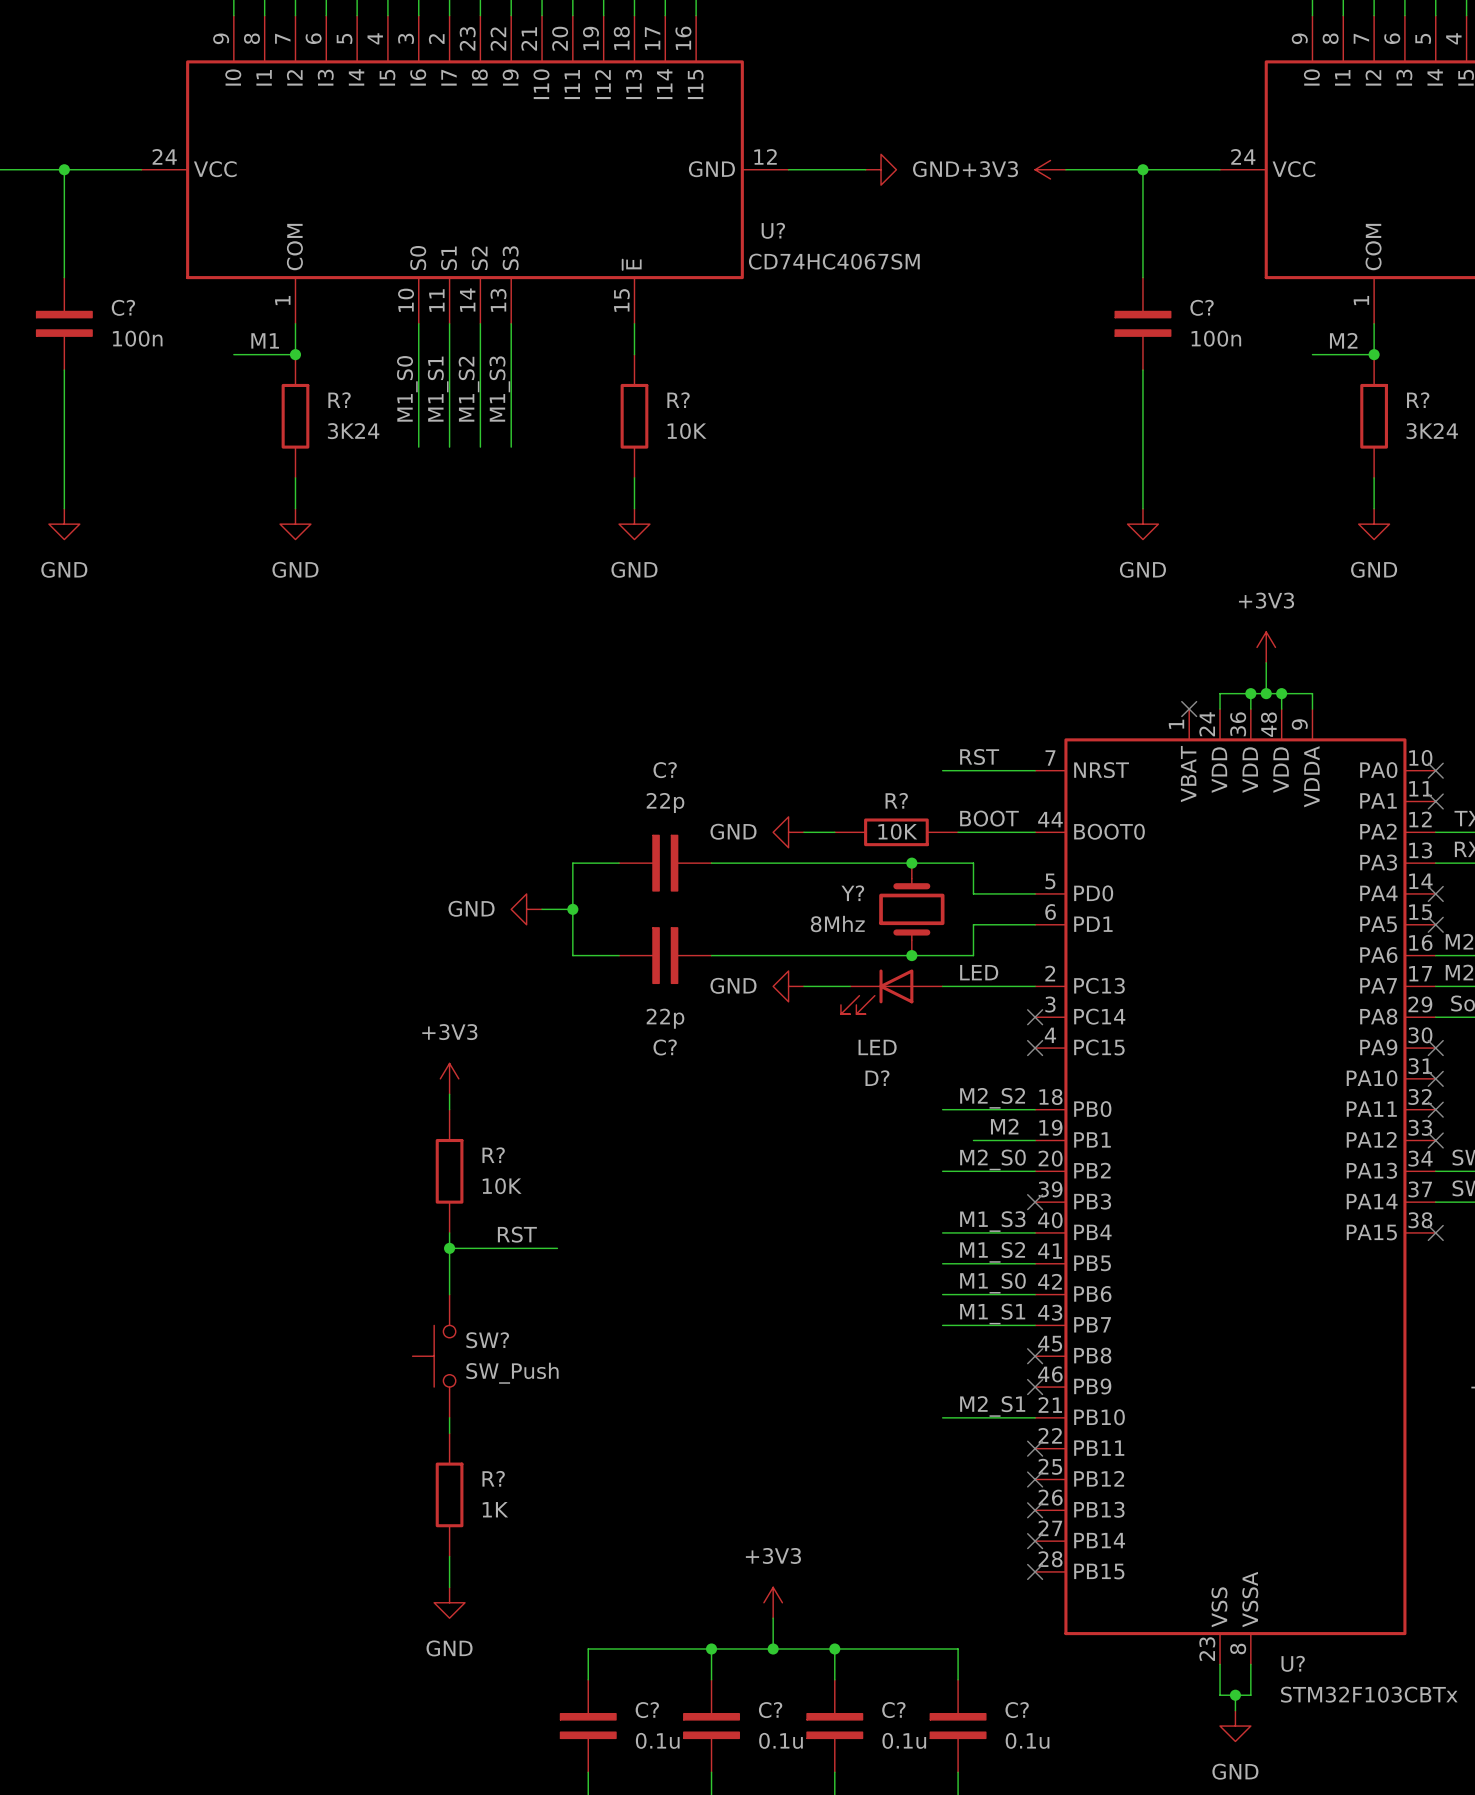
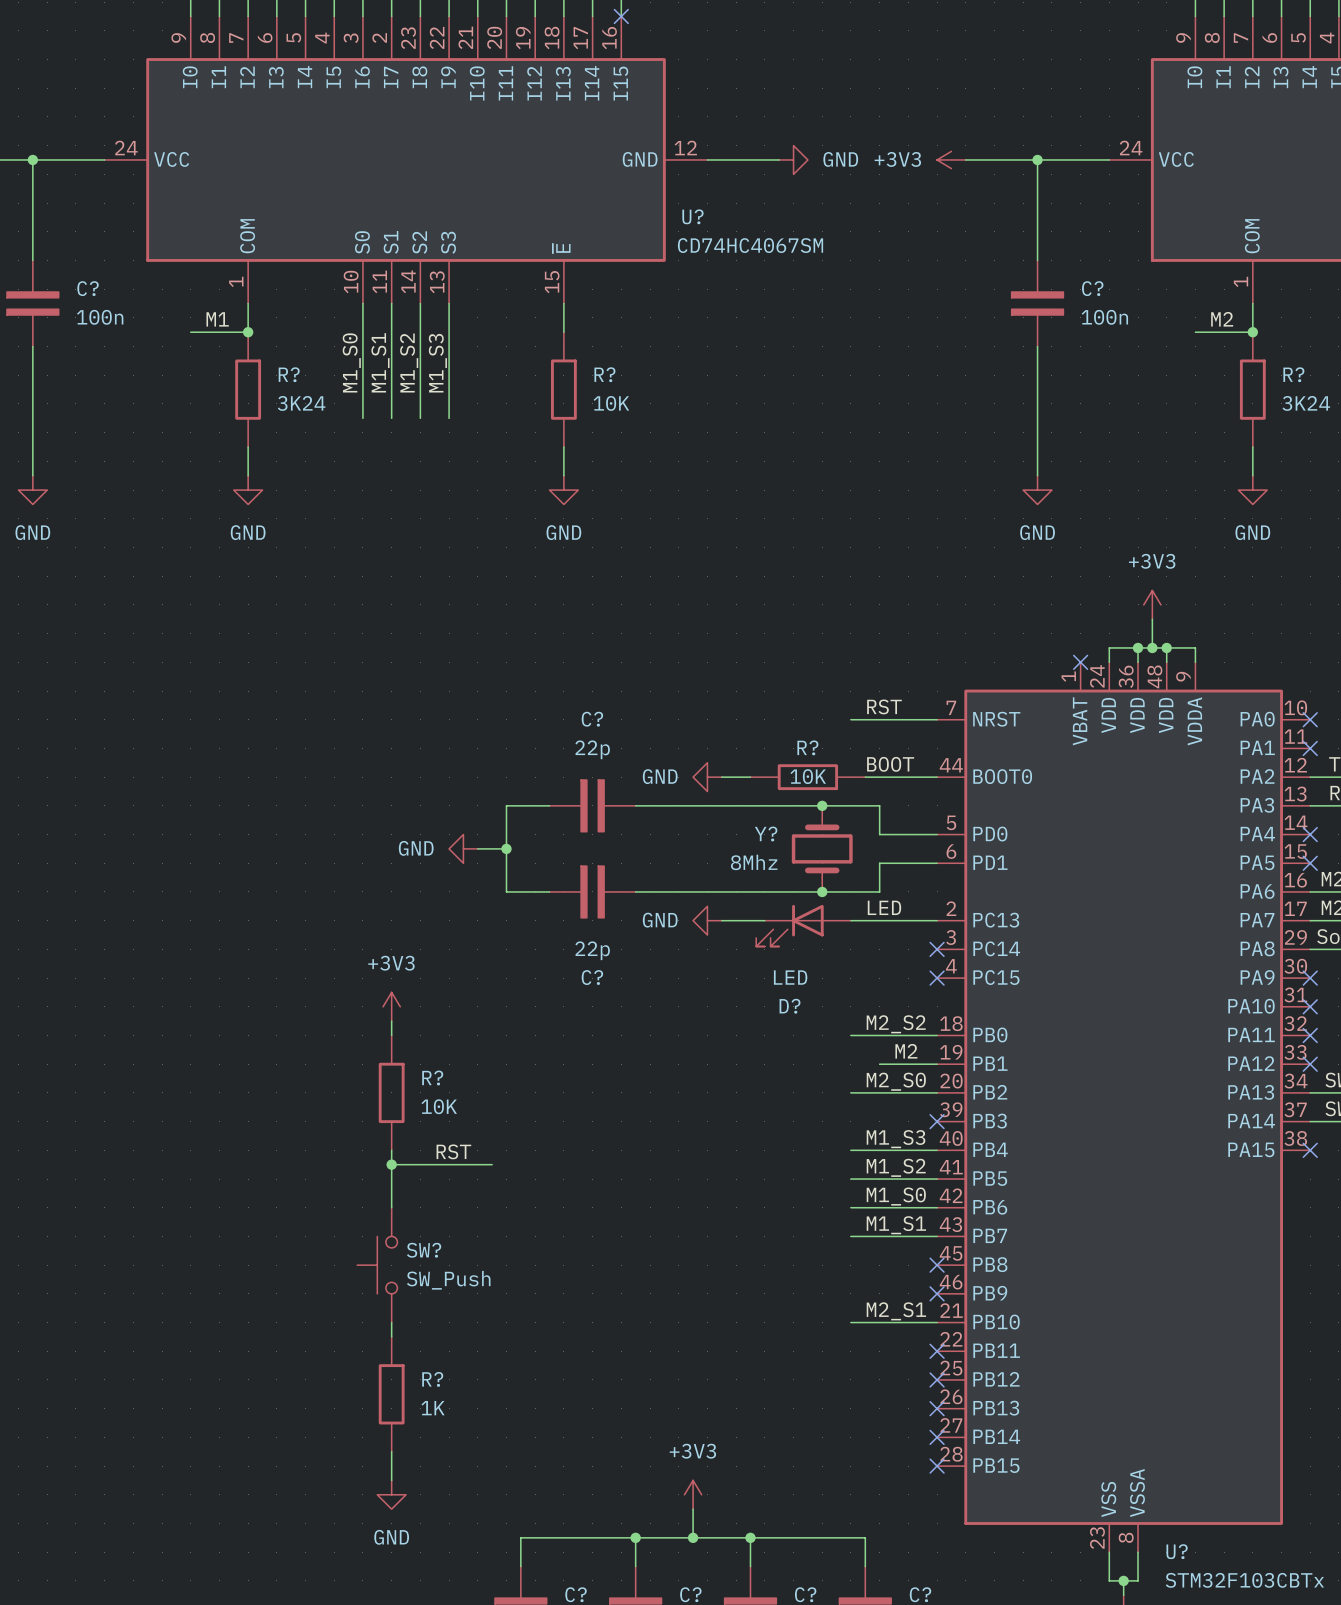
no-connect mark: none -> (621, 16)

